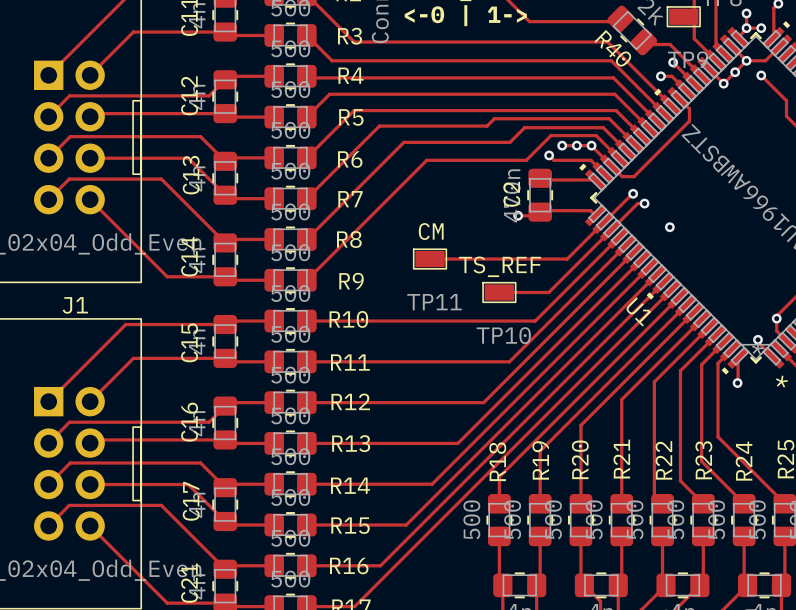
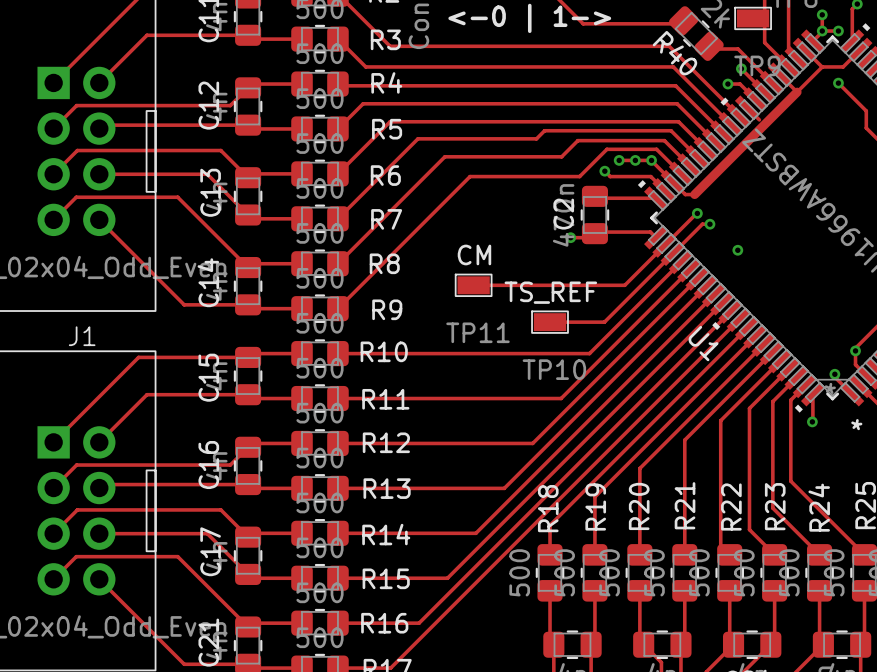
via: (746, 60) -> none
via: (735, 72) -> none
via: (723, 83) -> none
track: (689, 108) (689, 121) (633, 176) (630, 176) -> (797, 92) (694, 194)

